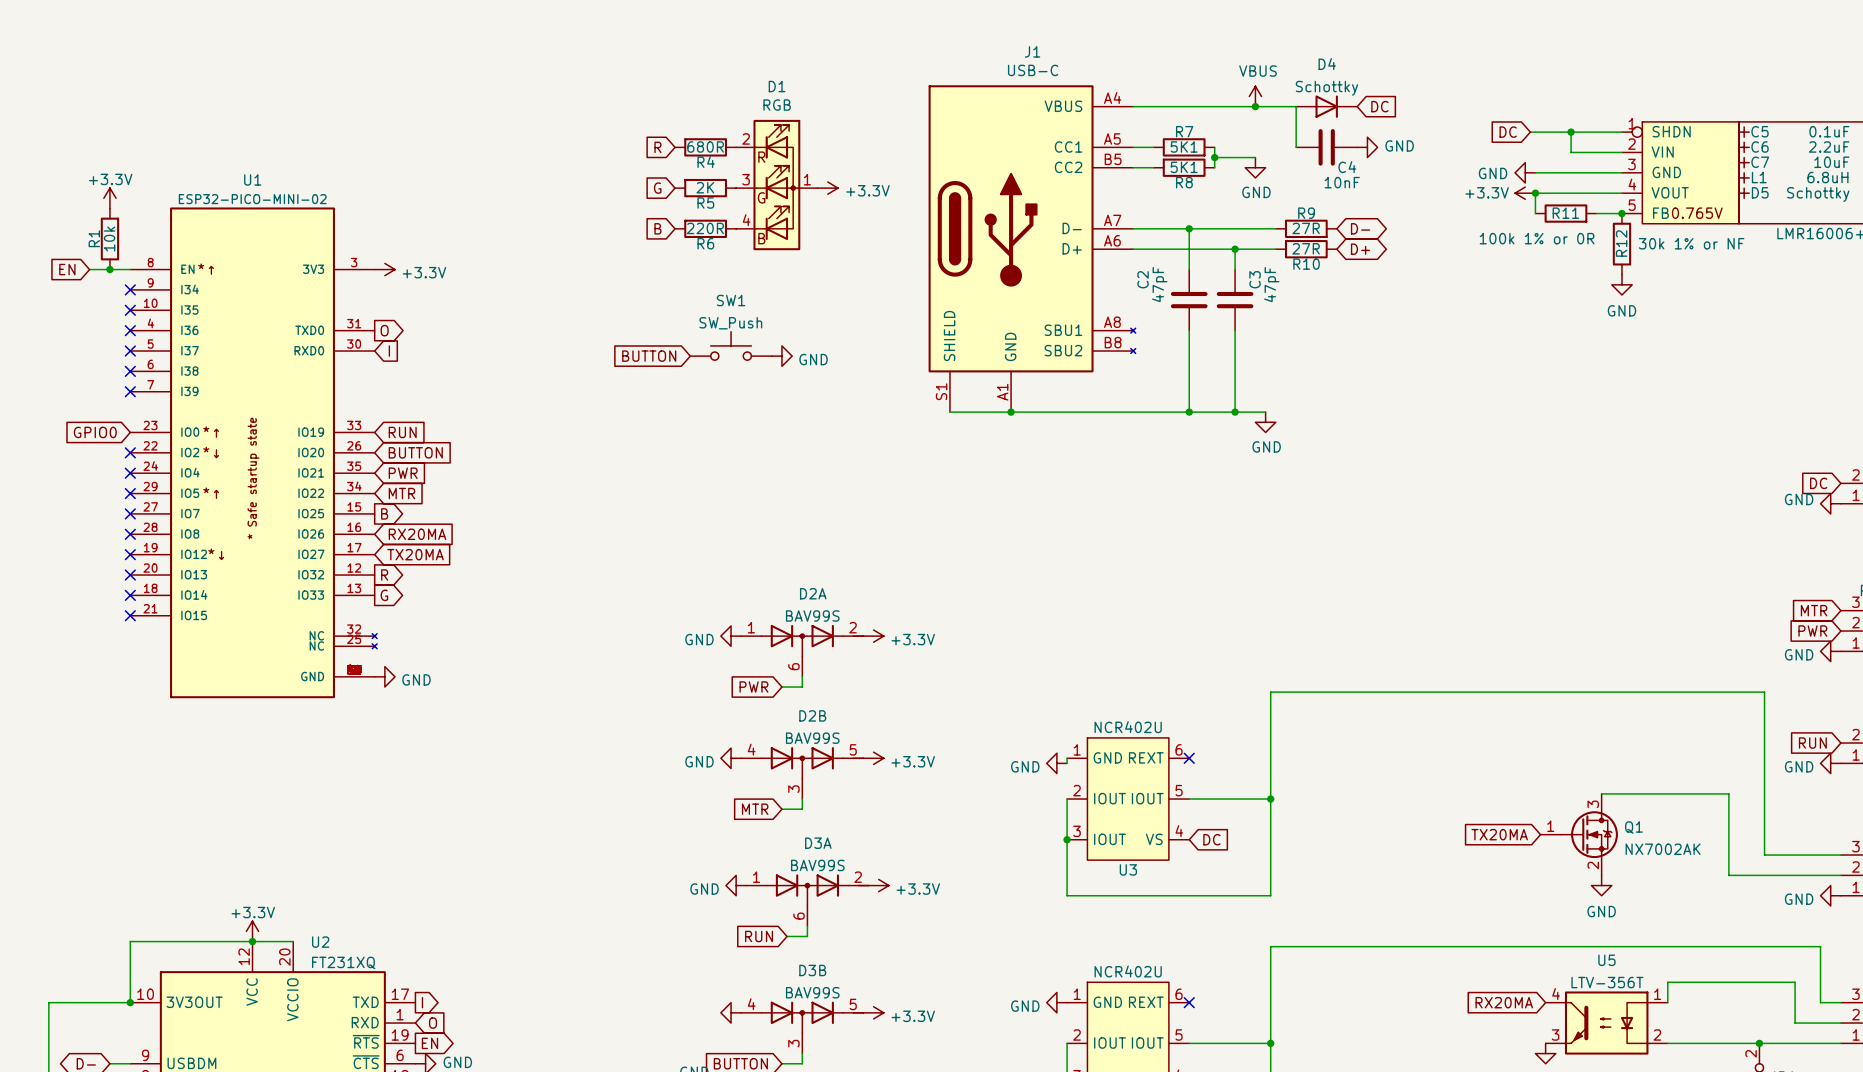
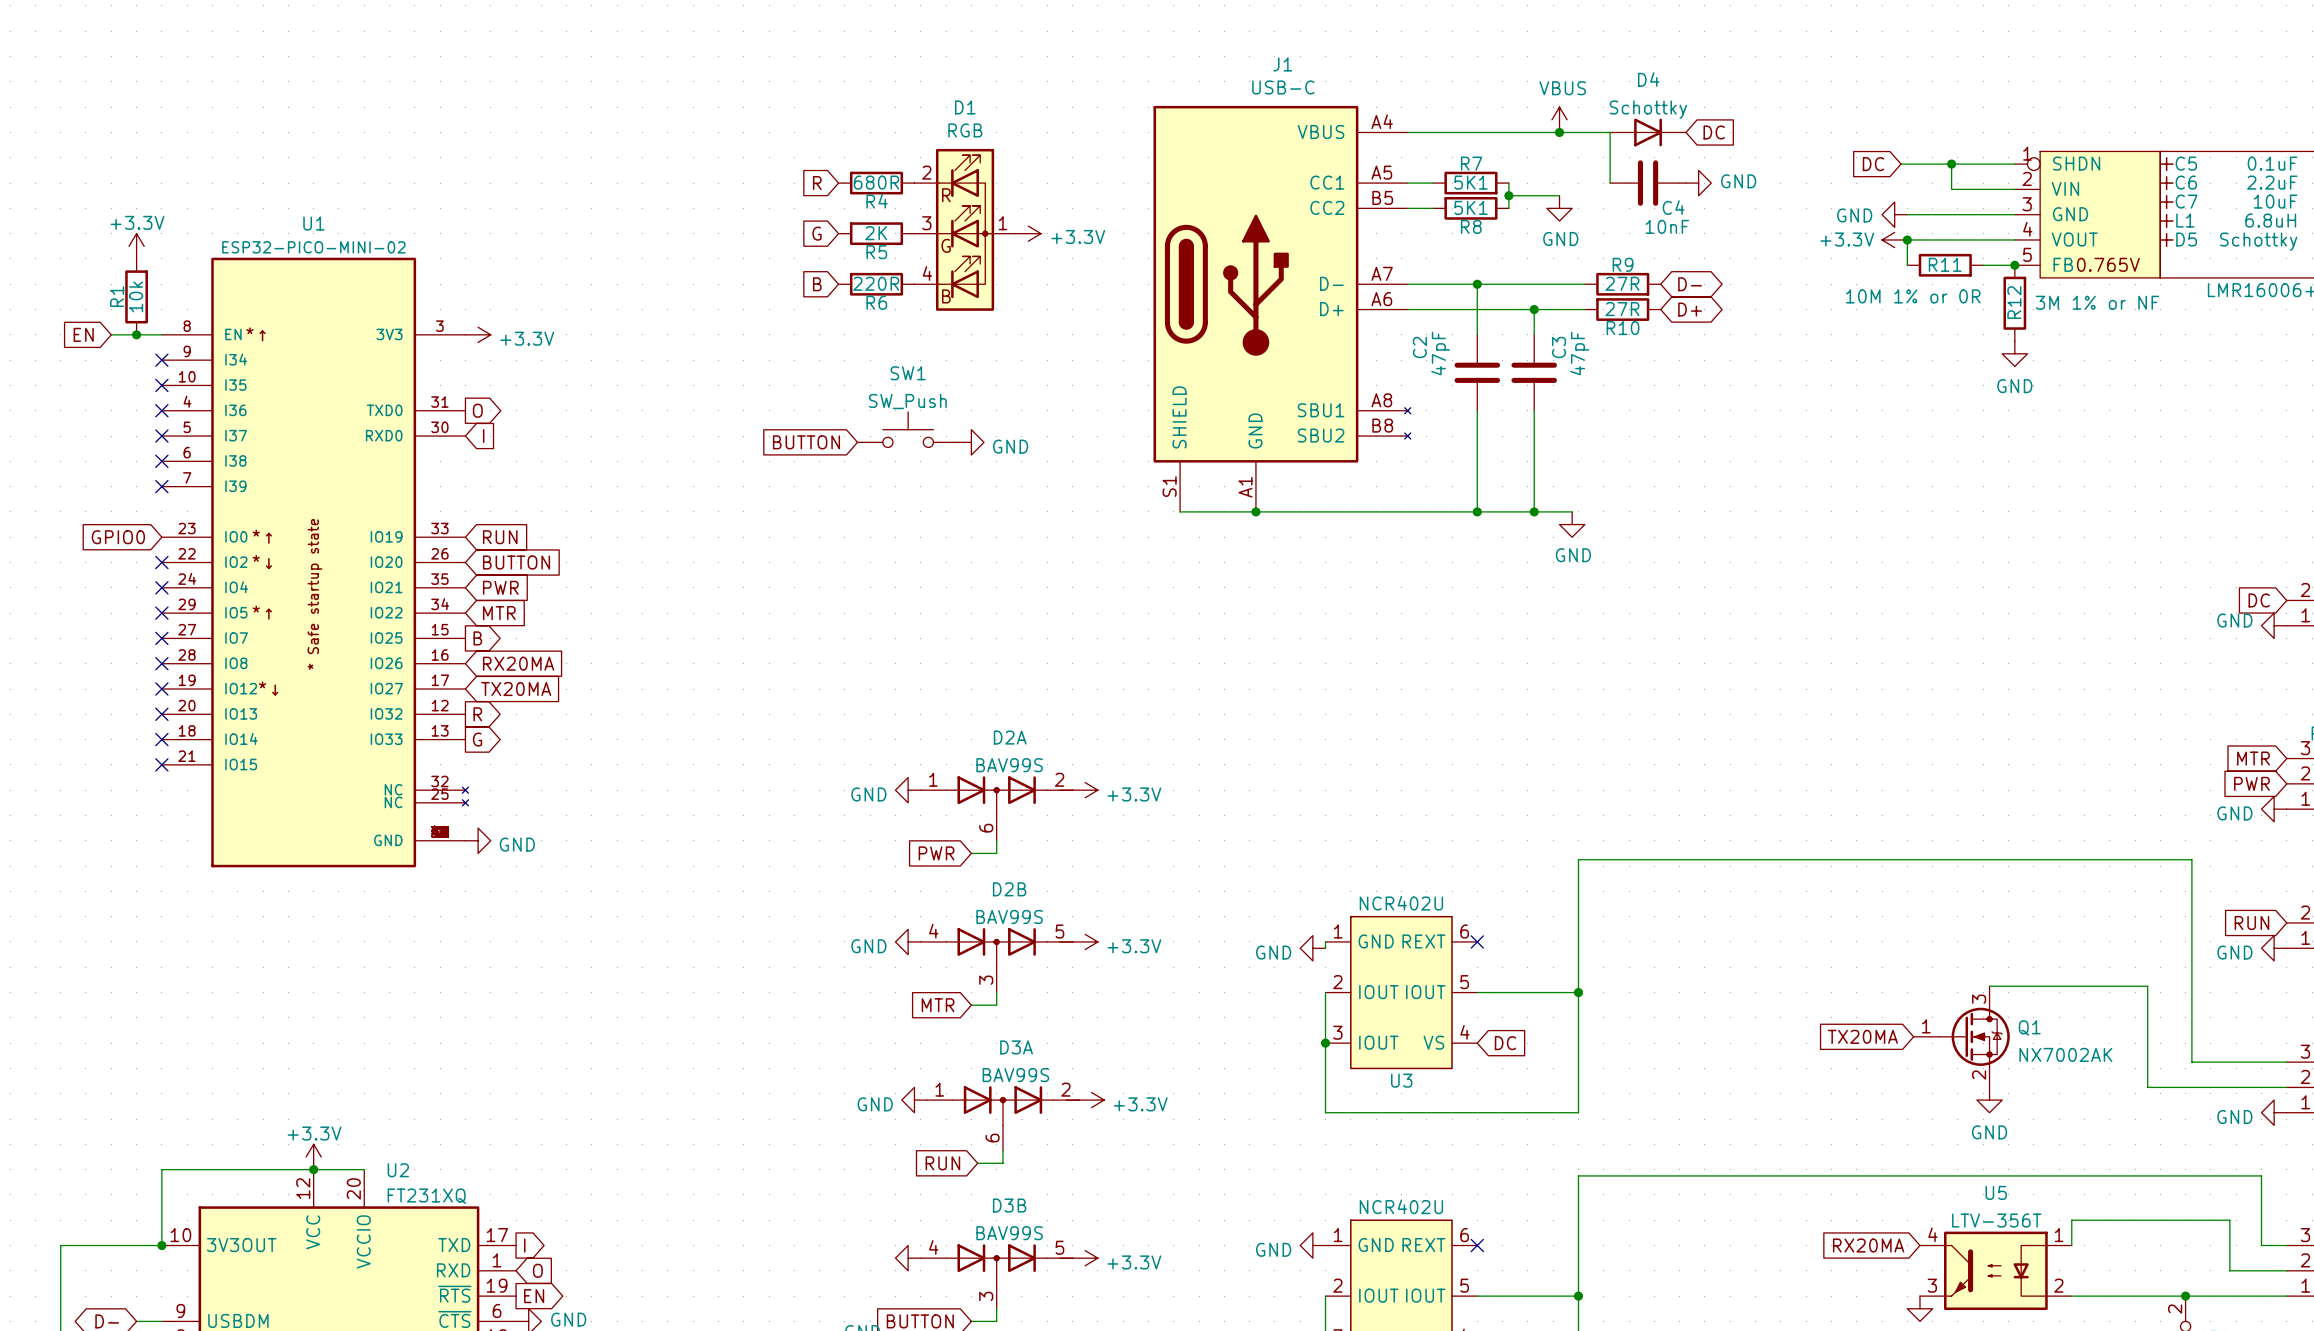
R11 value: 100k 1% or 0R (1537, 238) -> 10M 1% or 0R (1913, 296)
R12 value: 30k 1% or NF (1691, 243) -> 3M 1% or NF (2097, 302)

